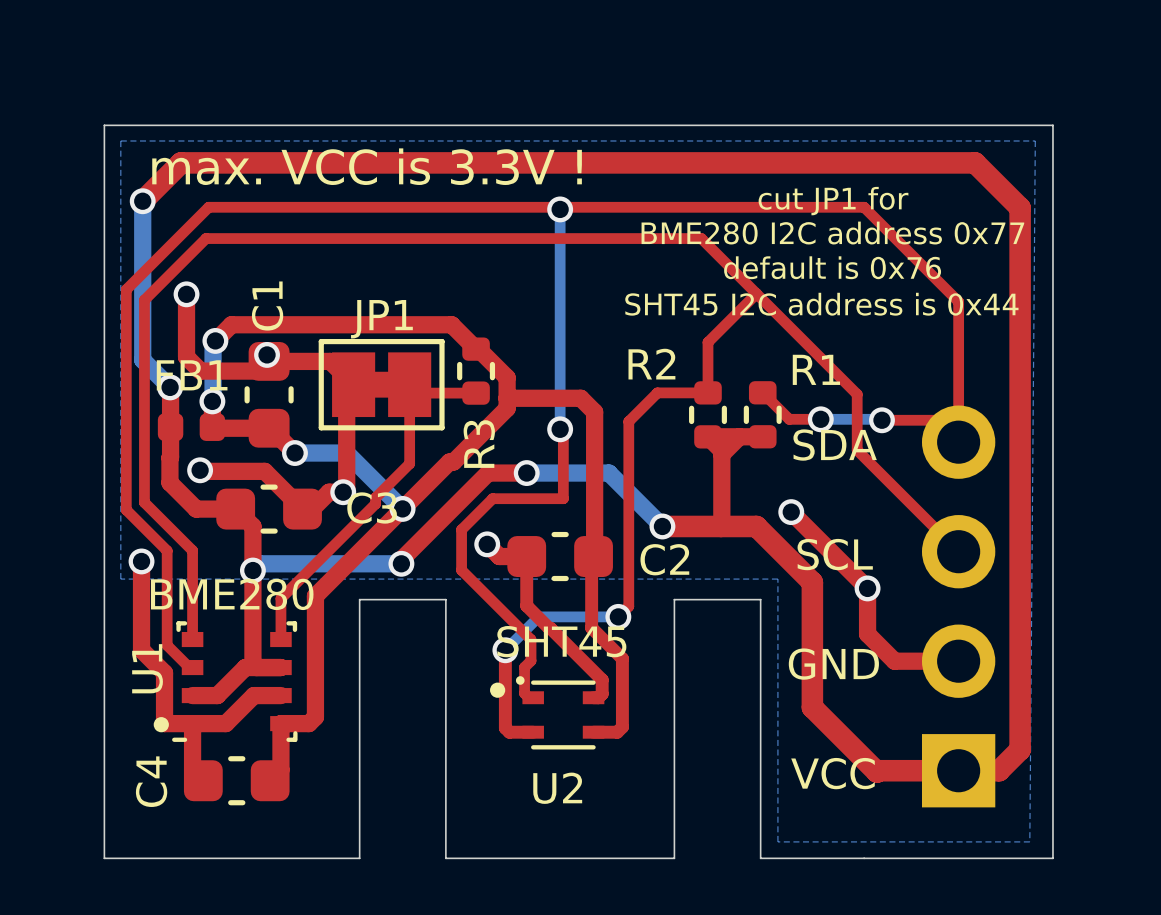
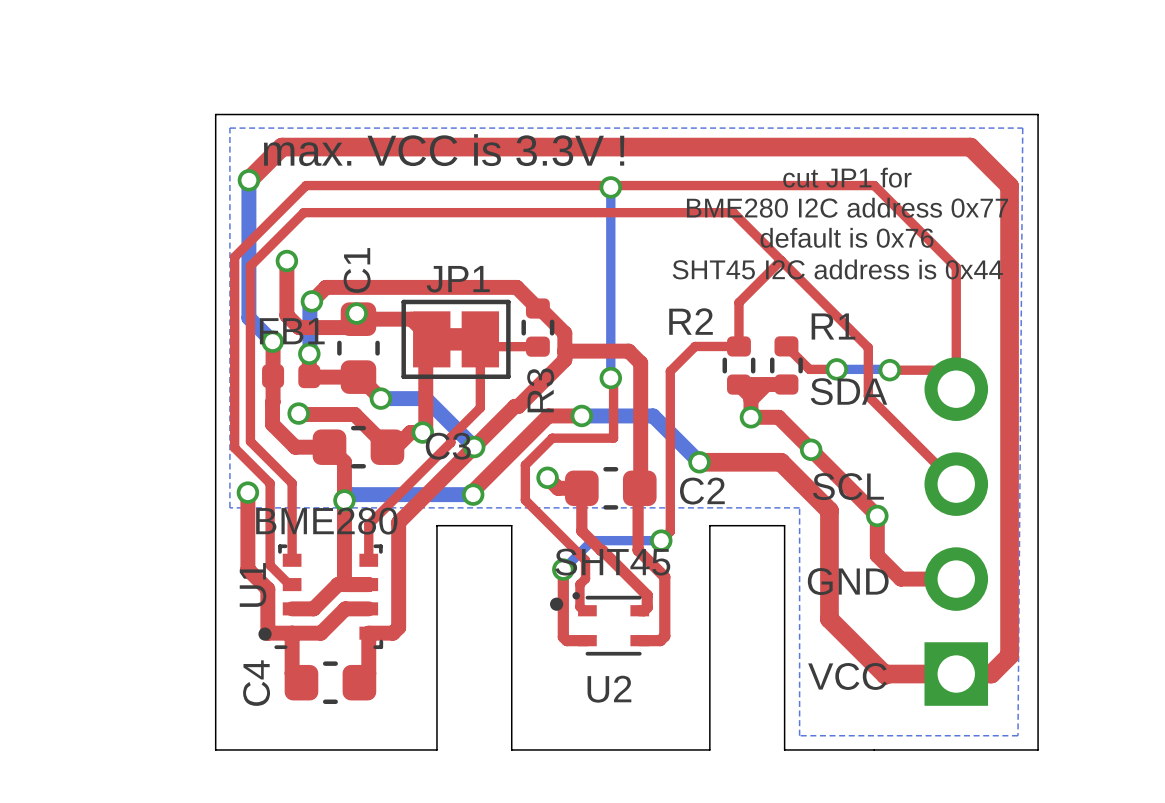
top track: (721, 474) (721, 526) -> (750, 417) (778, 417) (811, 449)
via: none -> (750, 417)

